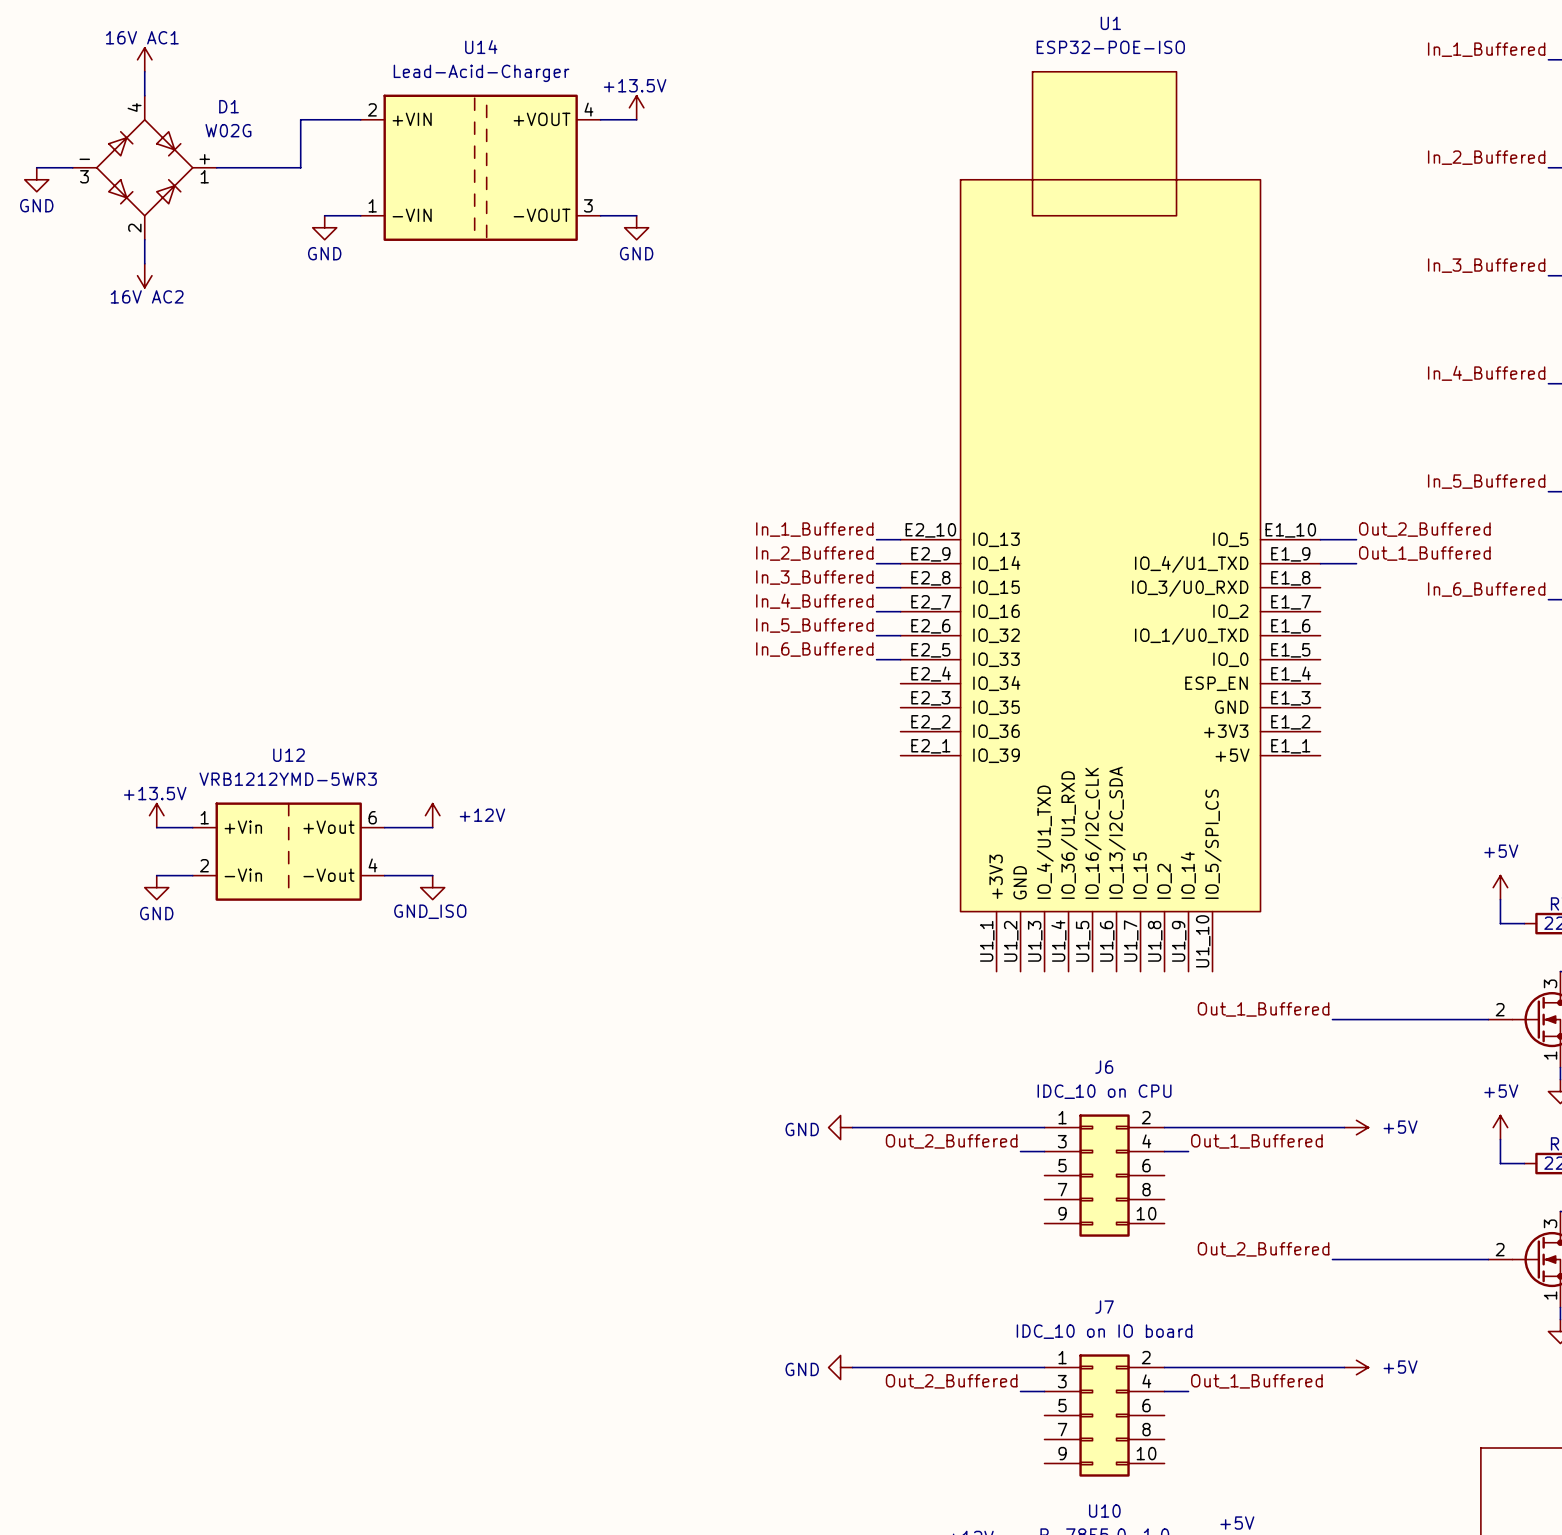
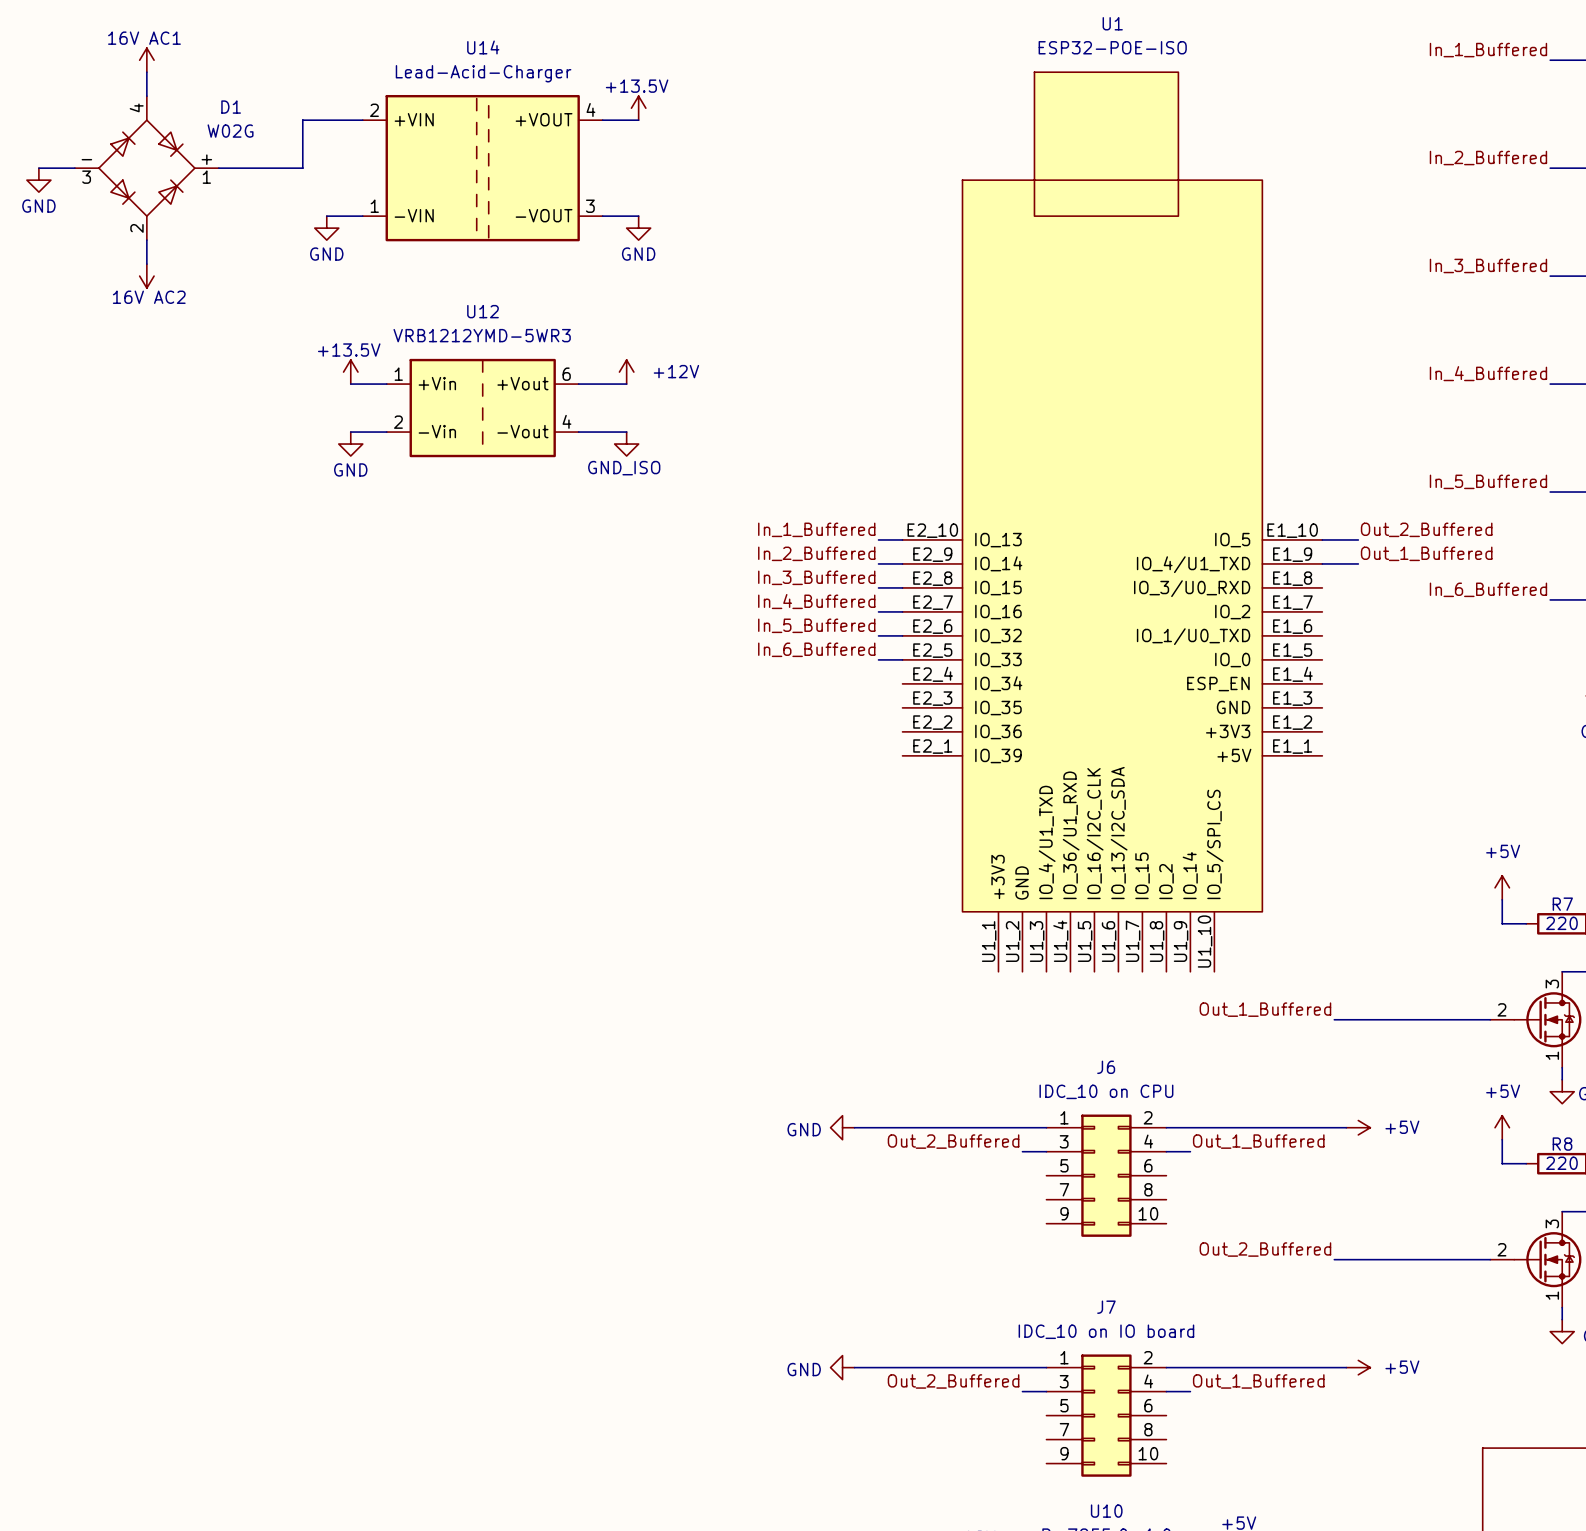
power symbol: none -> +13.5V (350, 372)
power symbol: none -> +12V (626, 372)
wire: none -> (350, 384) (386, 384)
wire: none -> (578, 384) (626, 384)
wire: none -> (350, 432) (386, 432)
wire: none -> (578, 432) (626, 432)
power symbol: none -> GND (350, 444)
power symbol: none -> GND_ISO (626, 444)
power symbol: +13.5V (156, 815) -> none
power symbol: +12V (432, 815) -> none
wire: (156, 827) (192, 827) -> none
wire: (384, 827) (432, 827) -> none
U12 position: (288, 851) -> (482, 408)
wire: (156, 875) (192, 875) -> none
wire: (384, 875) (432, 875) -> none
power symbol: GND (156, 887) -> none
power symbol: GND_ISO (432, 887) -> none

